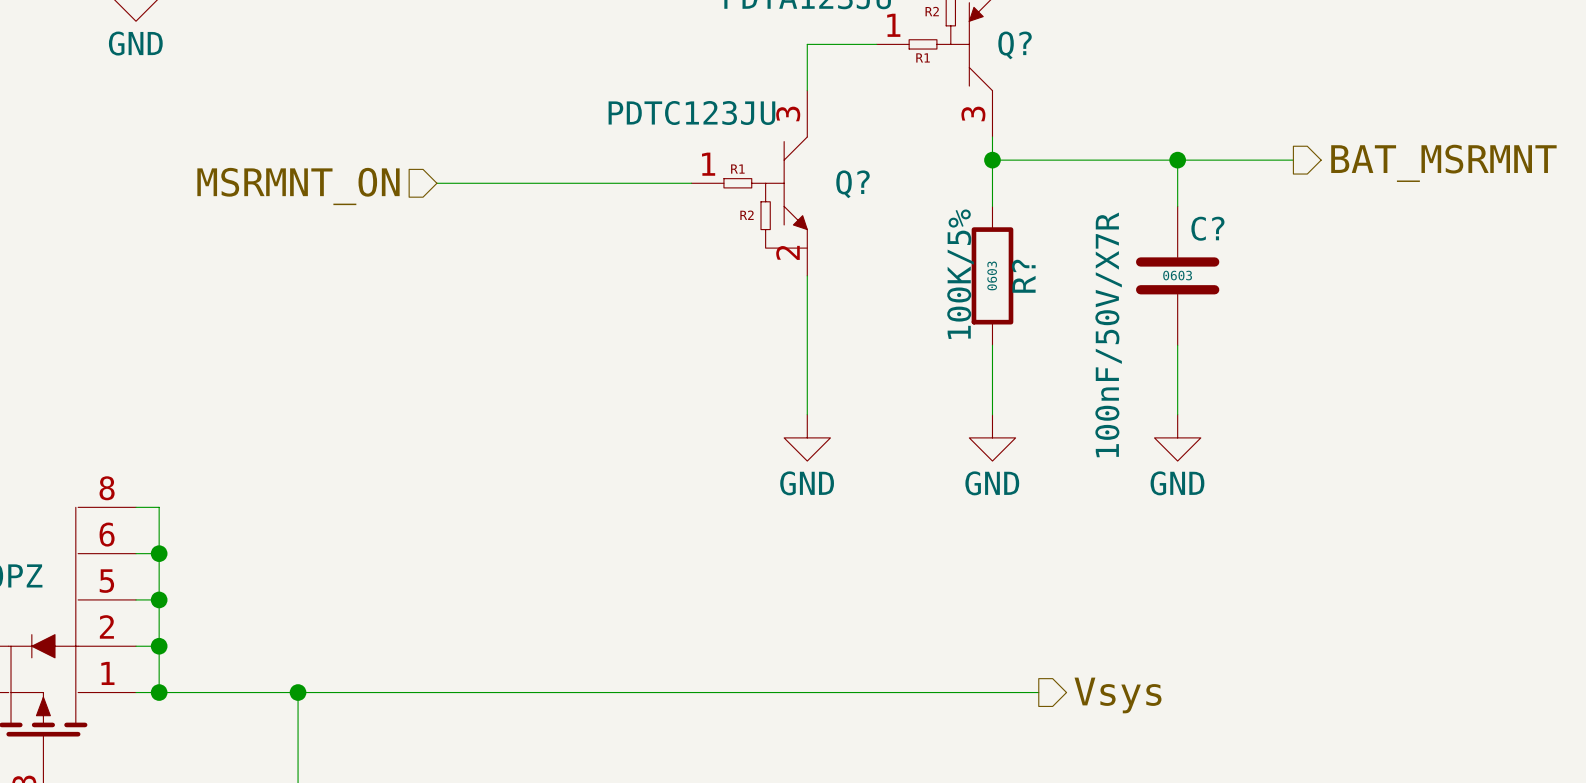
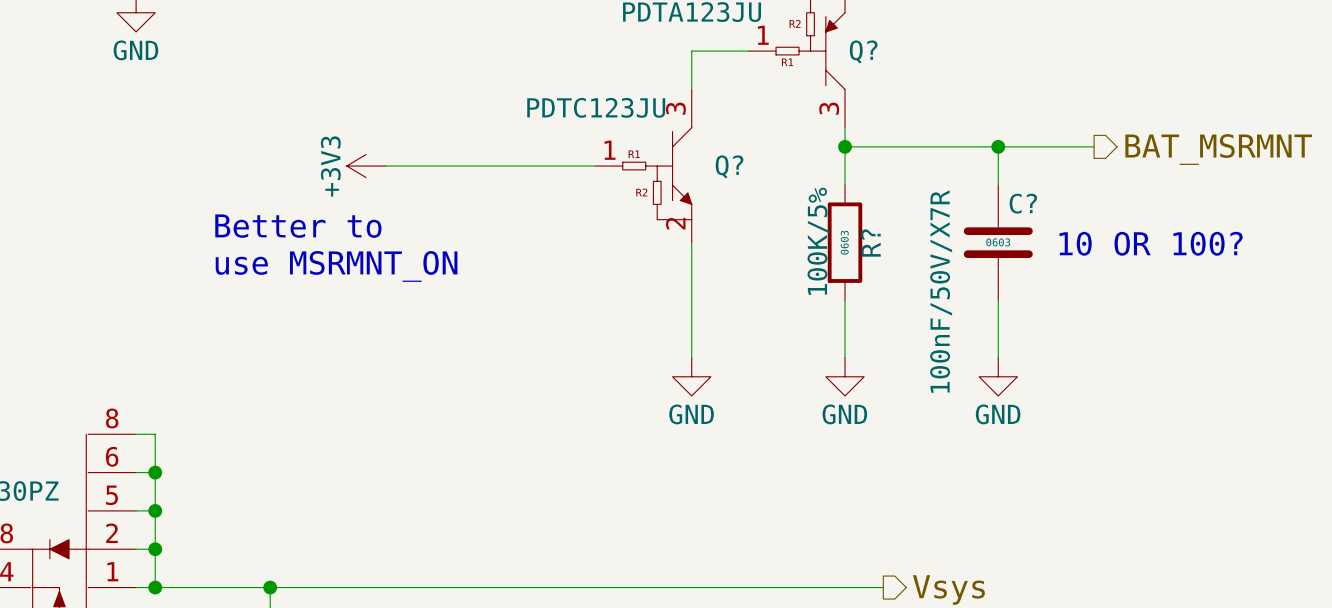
power symbol: none -> +3V3 (366, 166)
hierarchical label: MSRMNT_ON (298, 186) -> none
text: none -> Better to (298, 226)
text: none -> 10 OR 100? (1151, 243)
text: none -> use MSRMNT_ON (336, 266)

